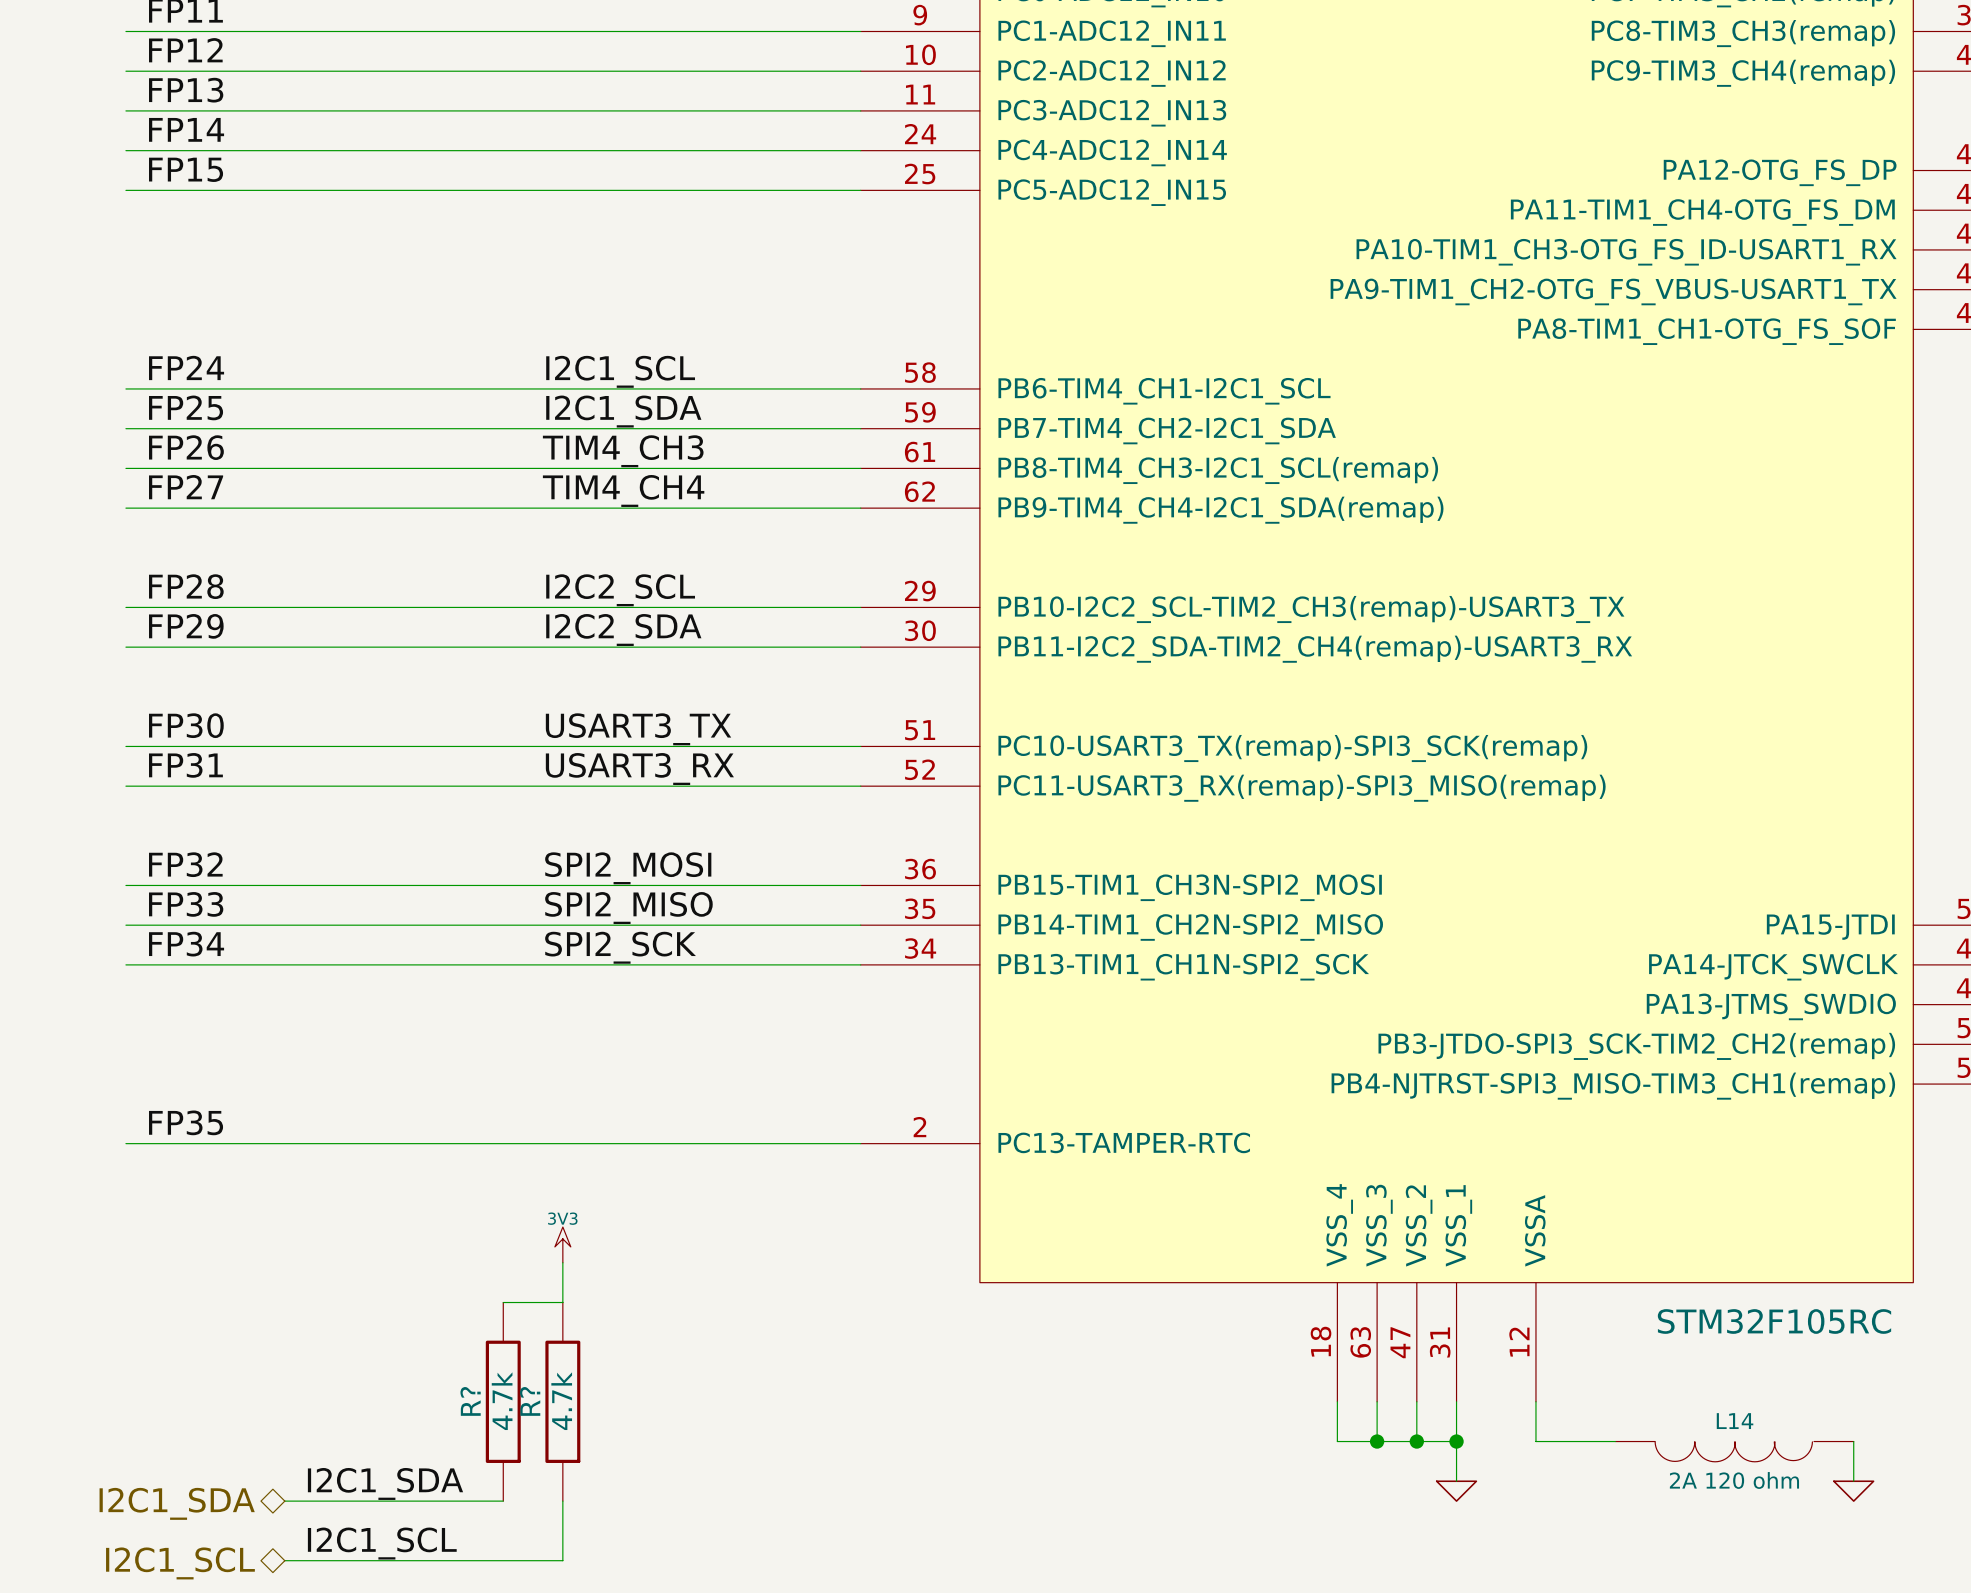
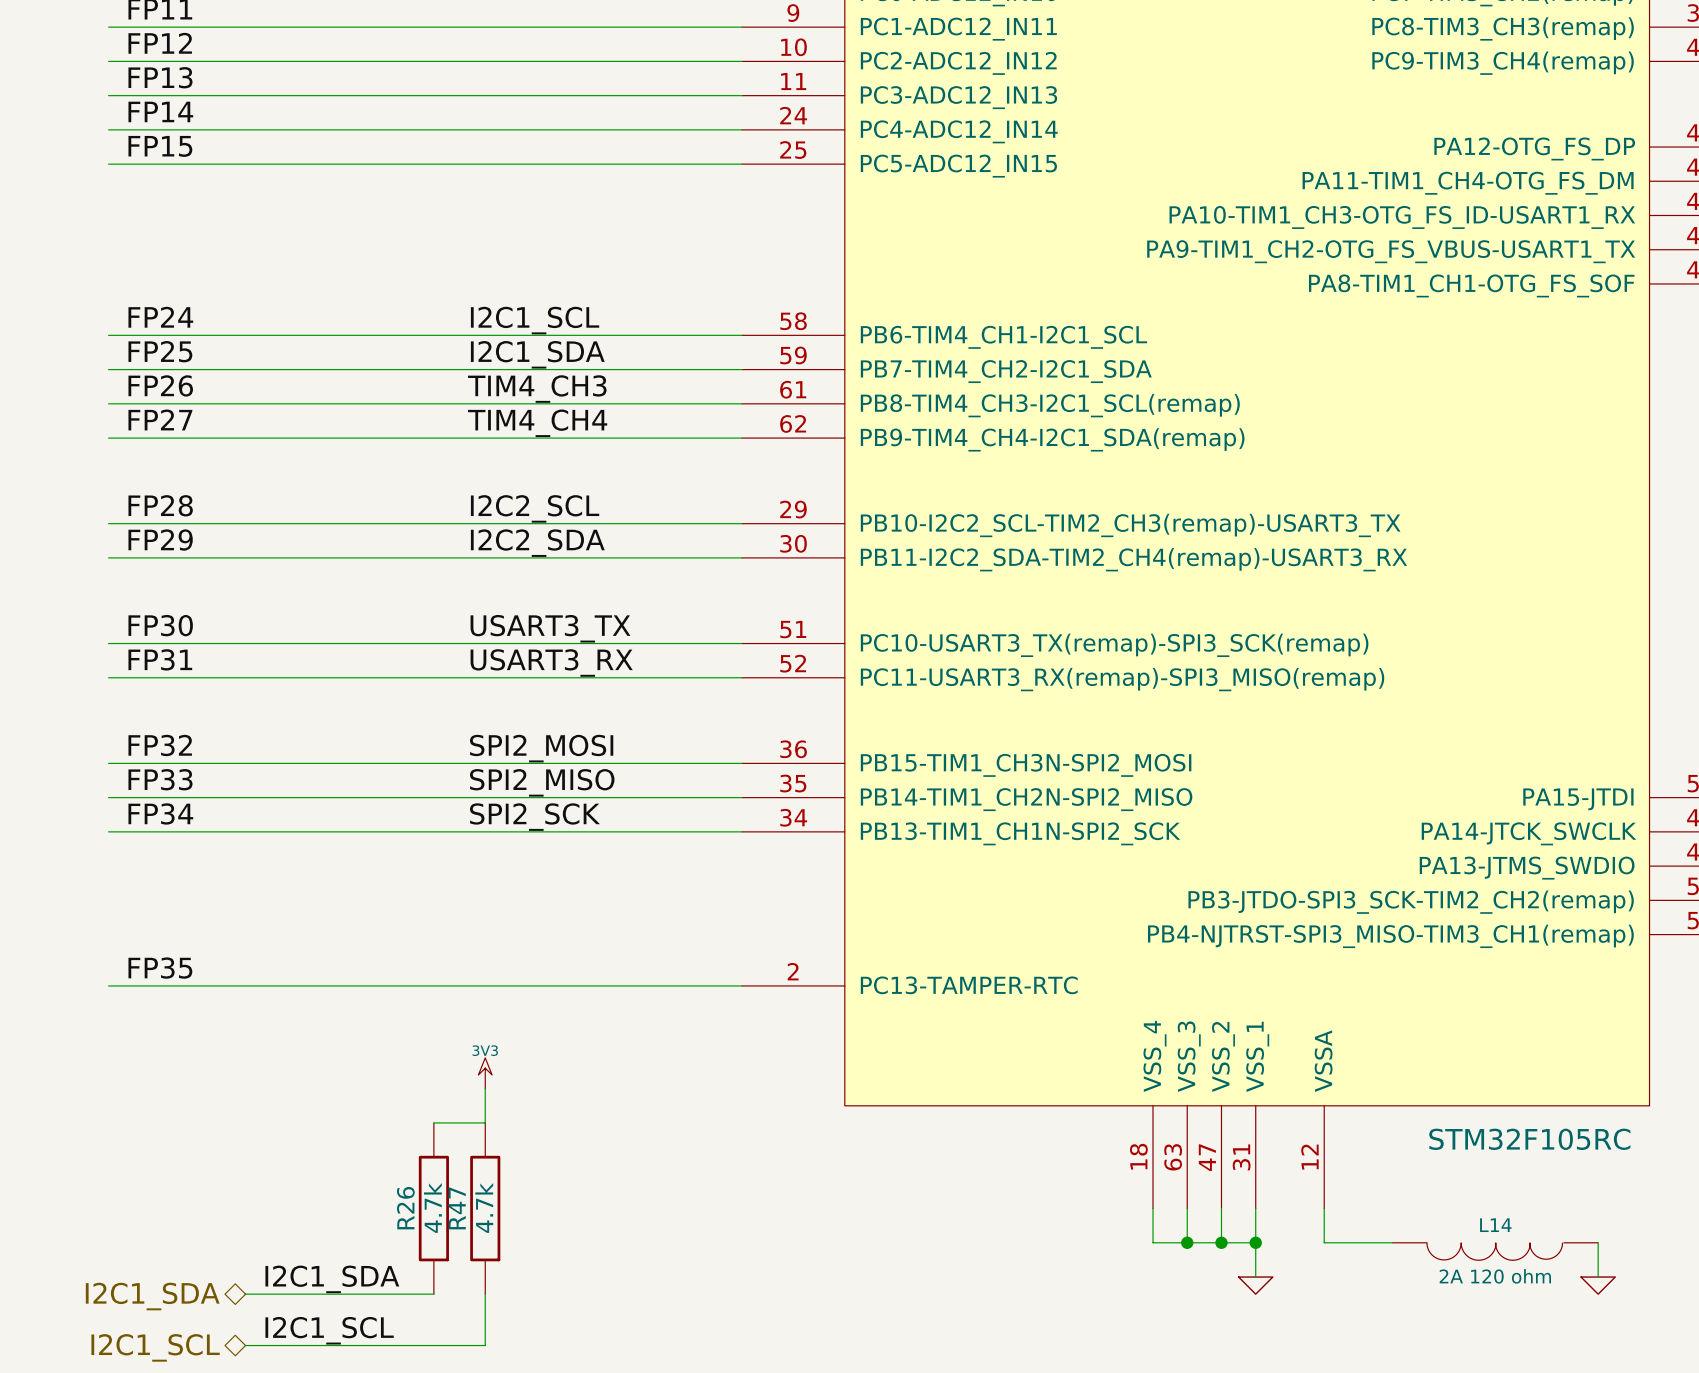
R? name: R? (470, 1401) -> R26 (405, 1208)
R? name: R? (530, 1401) -> R47 (457, 1208)

